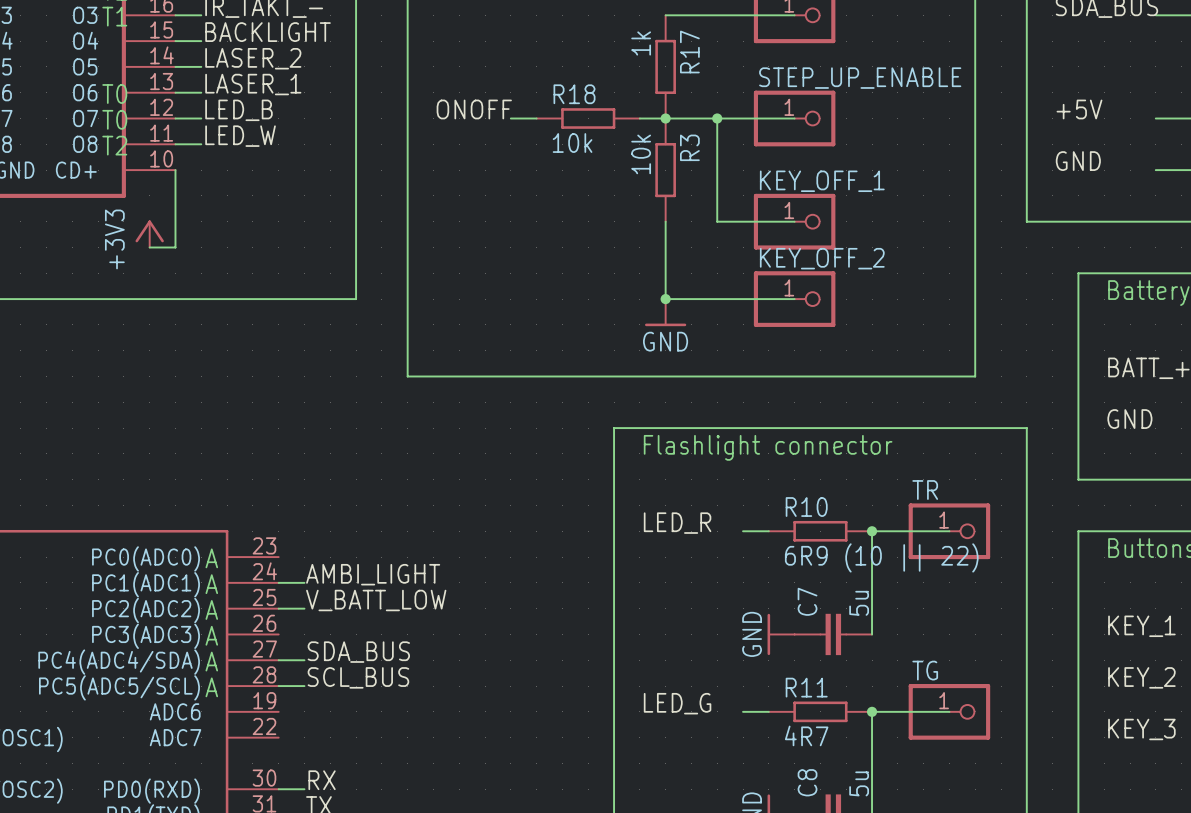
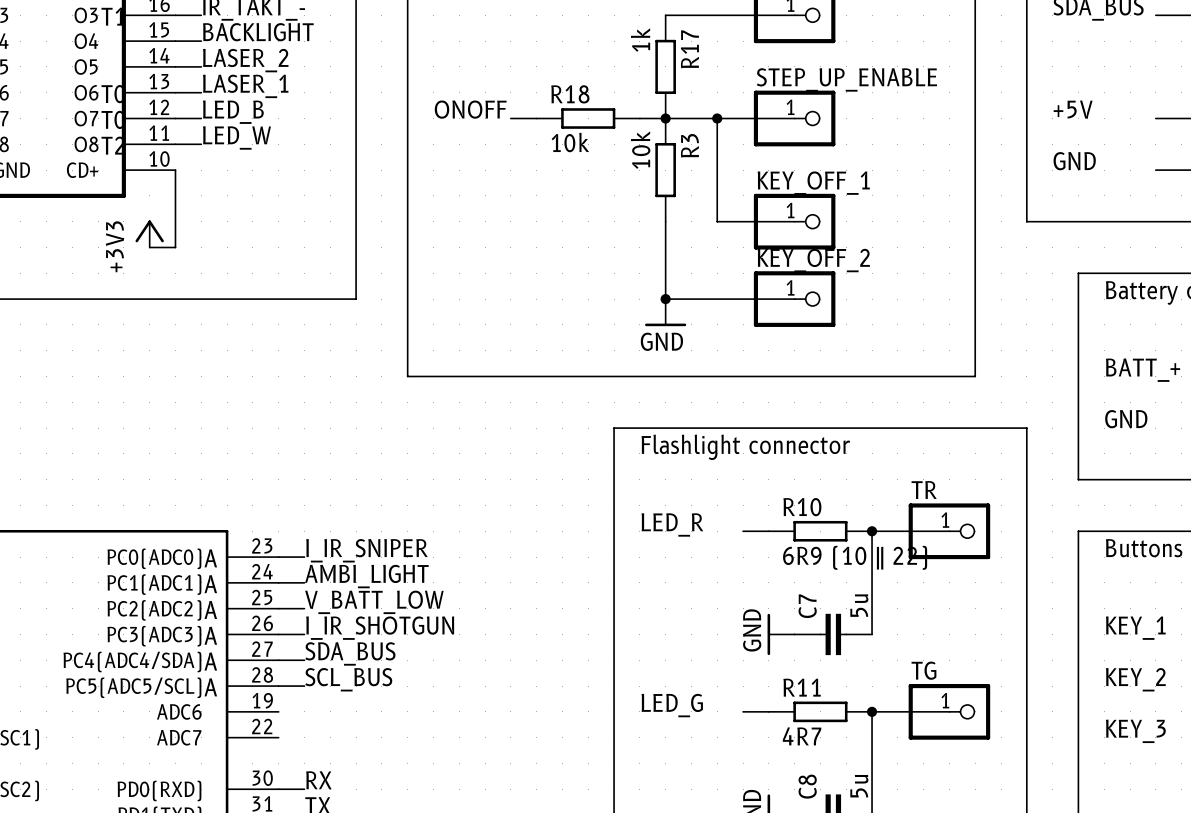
label: none -> I_IR_SNIPER (366, 550)
wire: none -> (278, 557) (304, 557)
label: none -> I_IR_SHOTGUN (380, 628)
wire: none -> (278, 634) (304, 634)

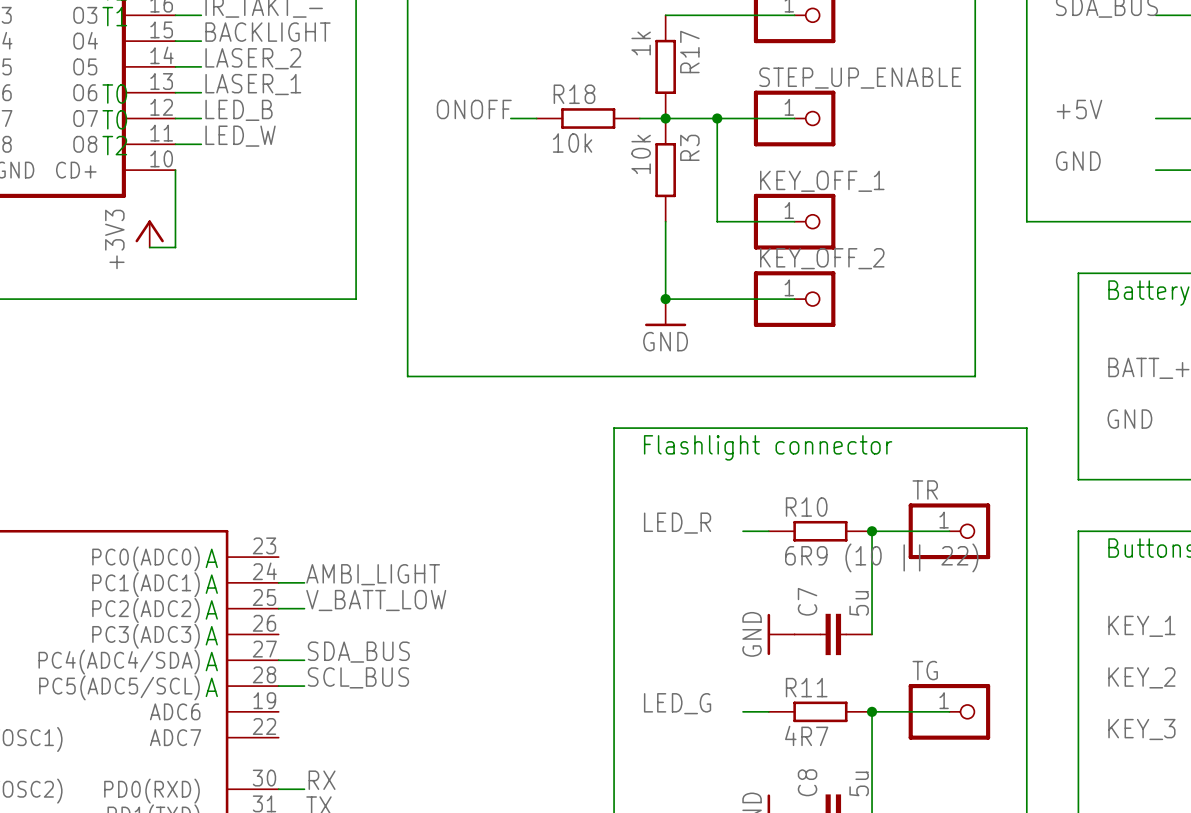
label: I_IR_SNIPER (366, 550) -> none
wire: (278, 557) (304, 557) -> none
label: I_IR_SHOTGUN (380, 628) -> none
wire: (278, 634) (304, 634) -> none

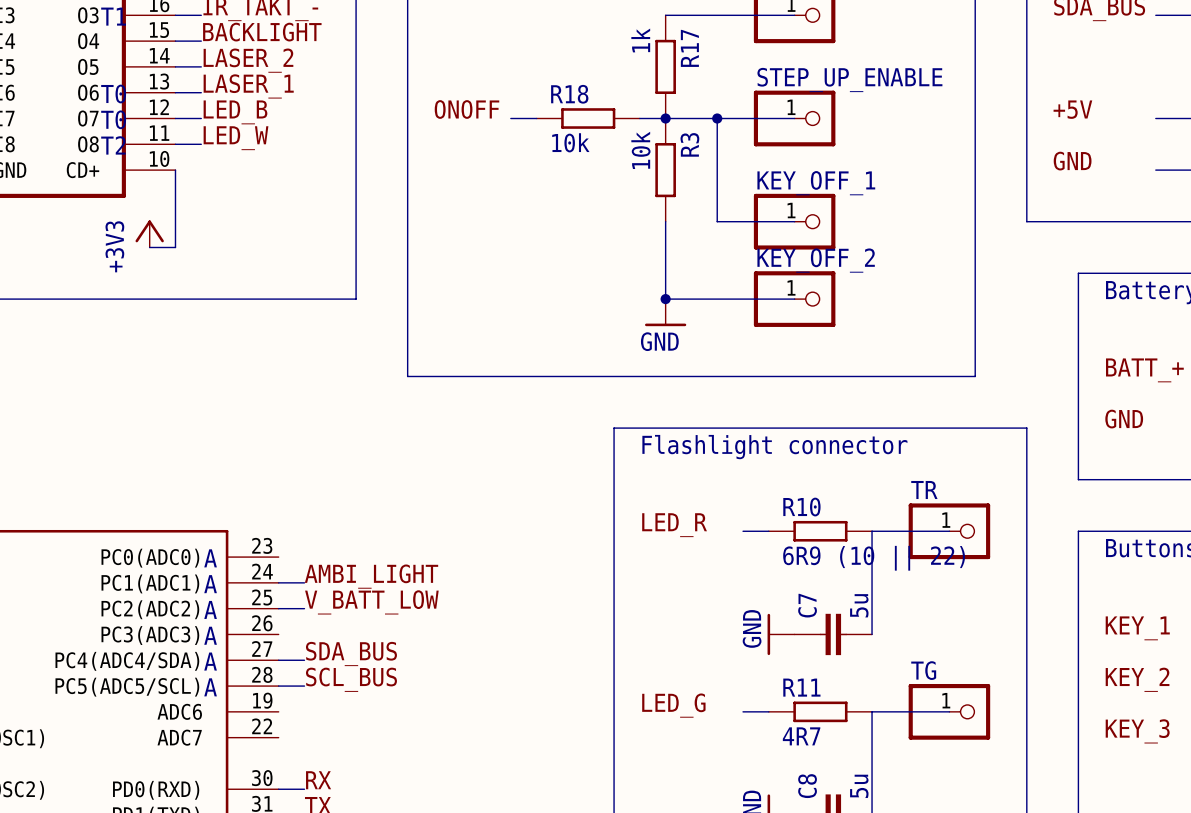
junction: (872, 531) -> none
junction: (872, 711) -> none

